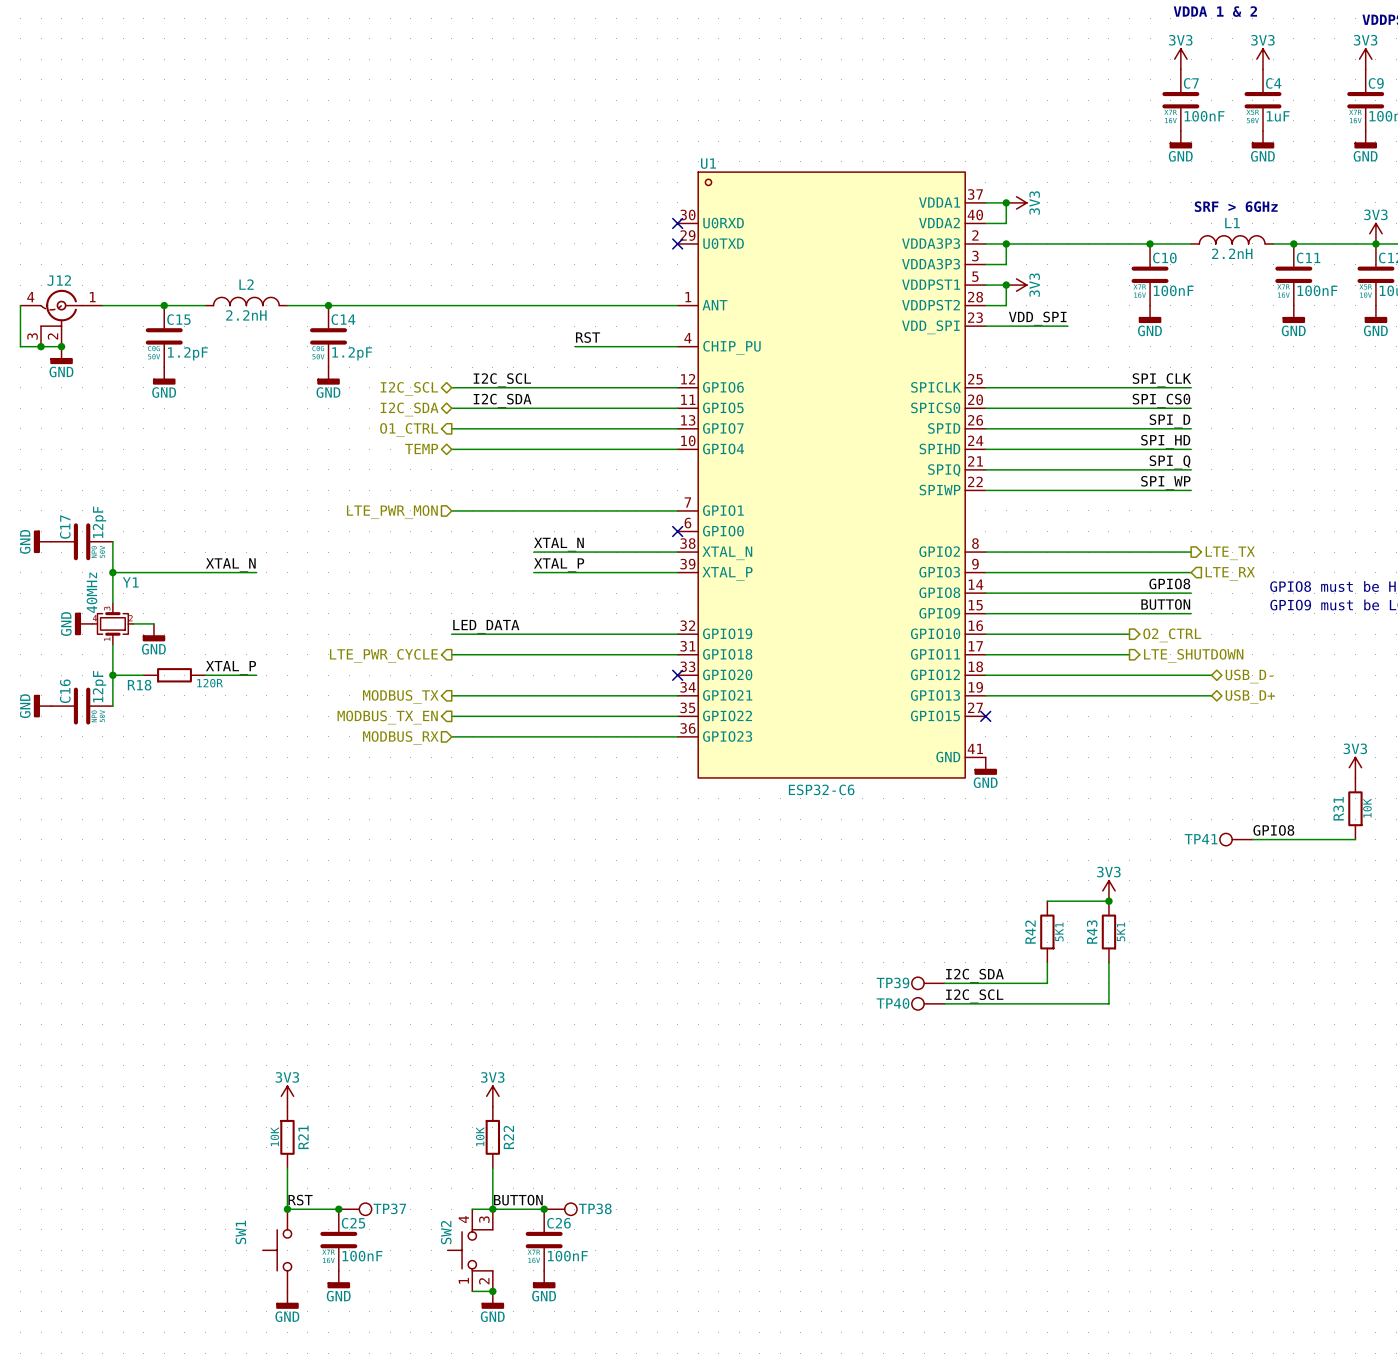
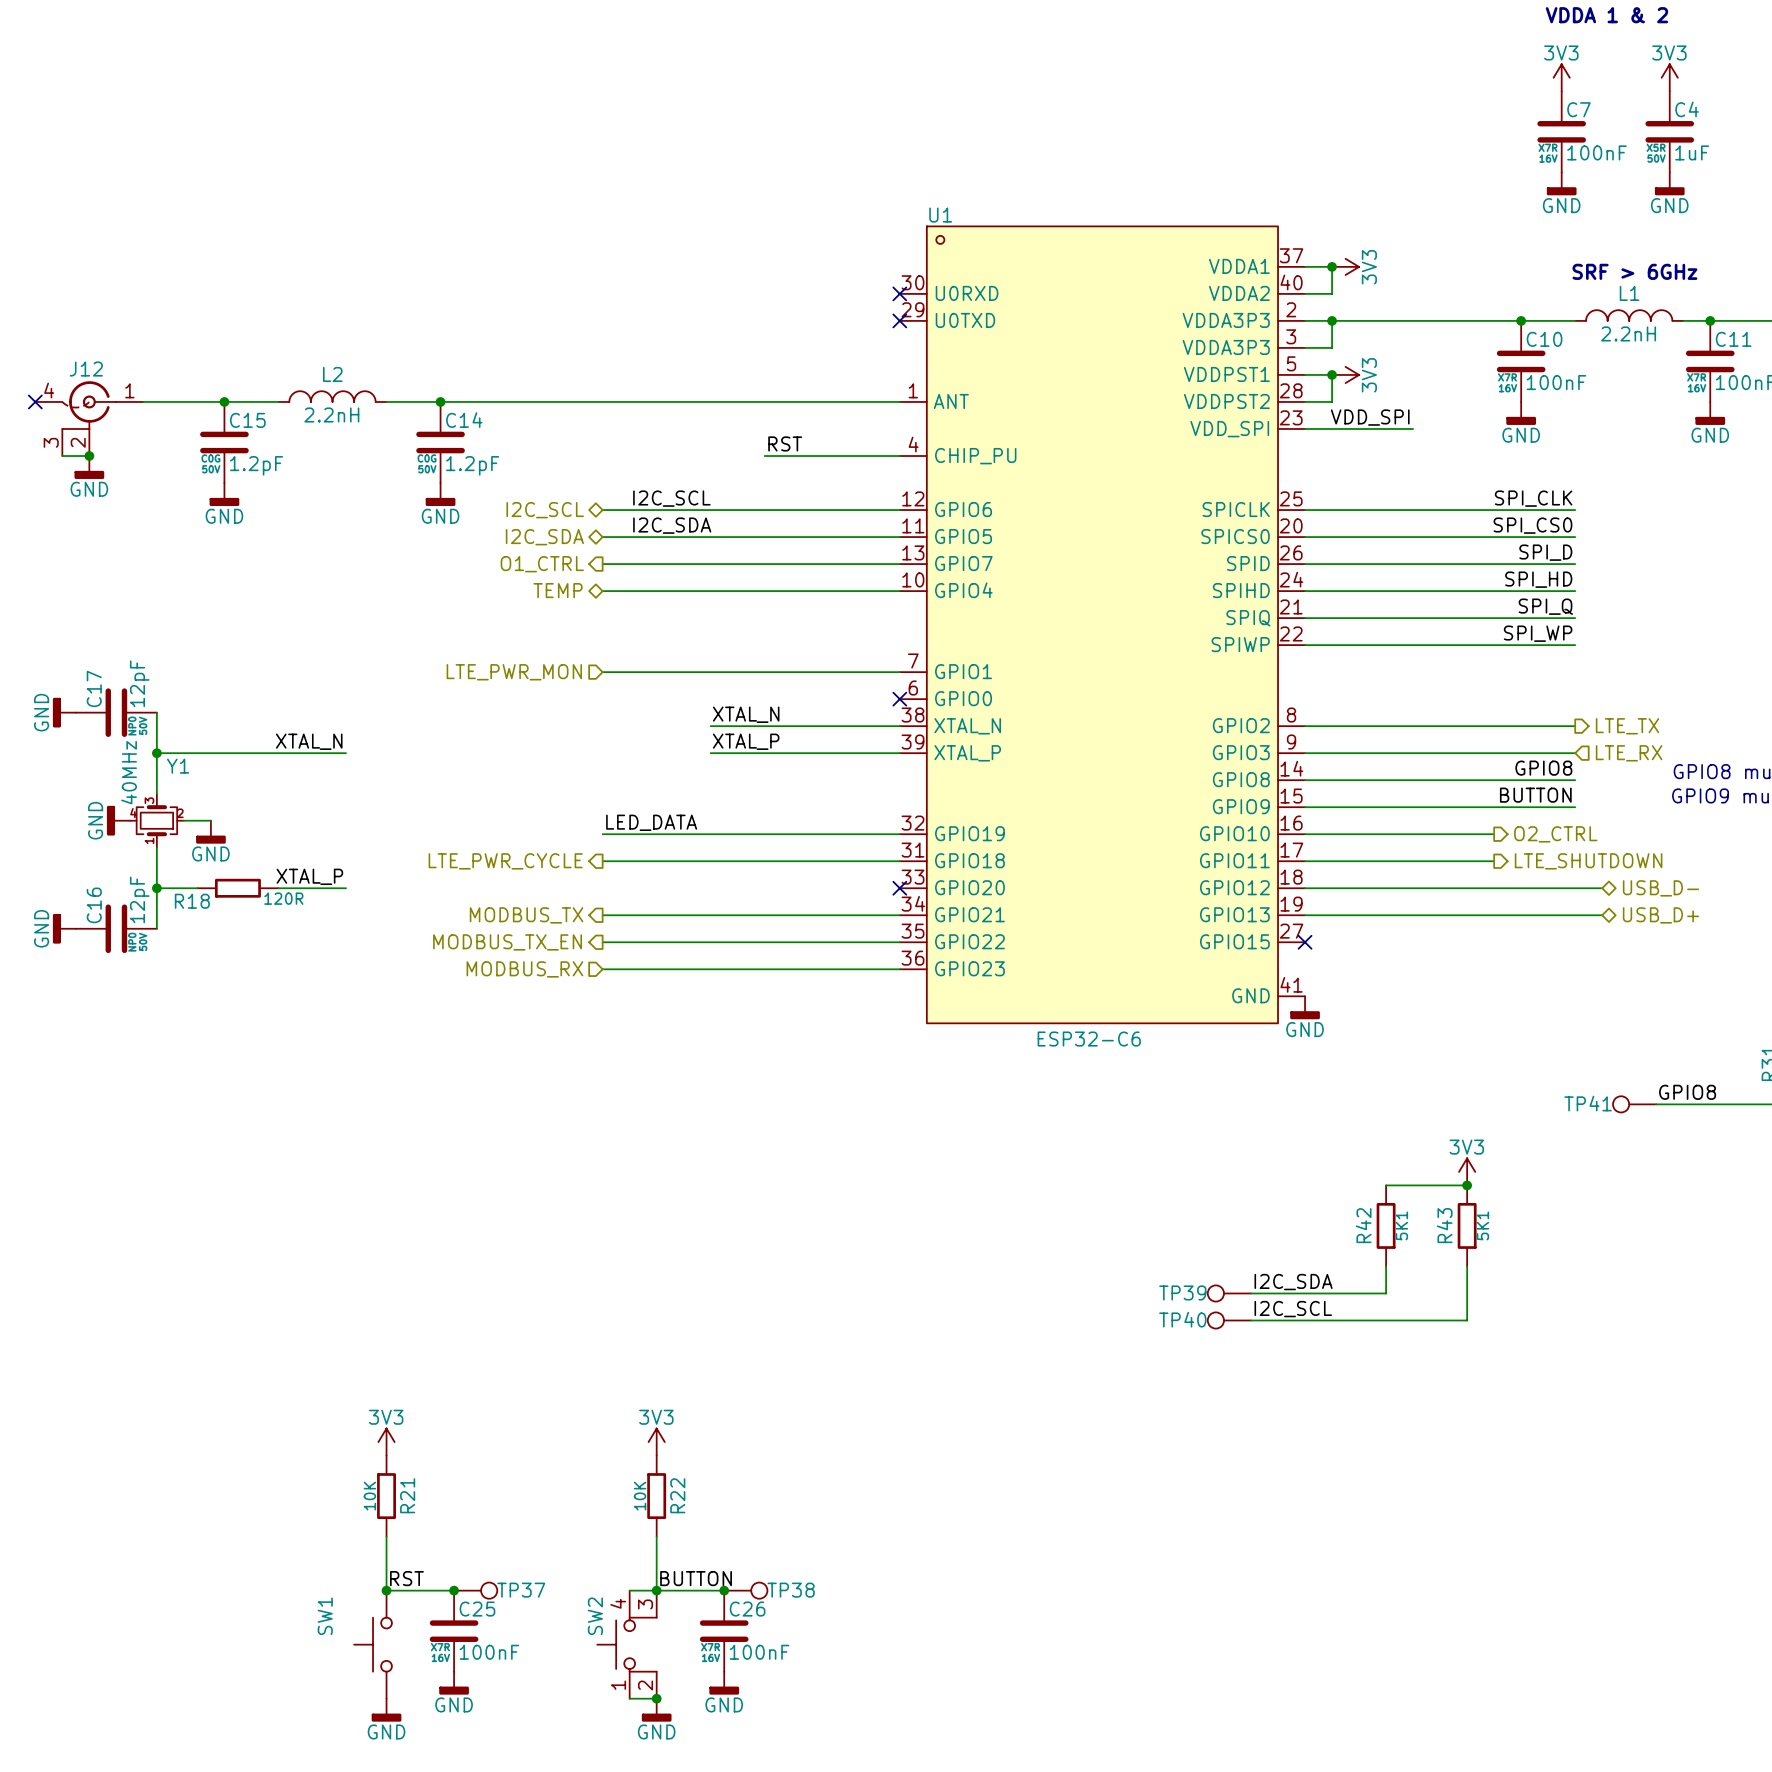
wire: (20, 305) (20, 346) (41, 346) -> none
no-connect mark: none -> (35, 401)
junction: (41, 346) -> none

